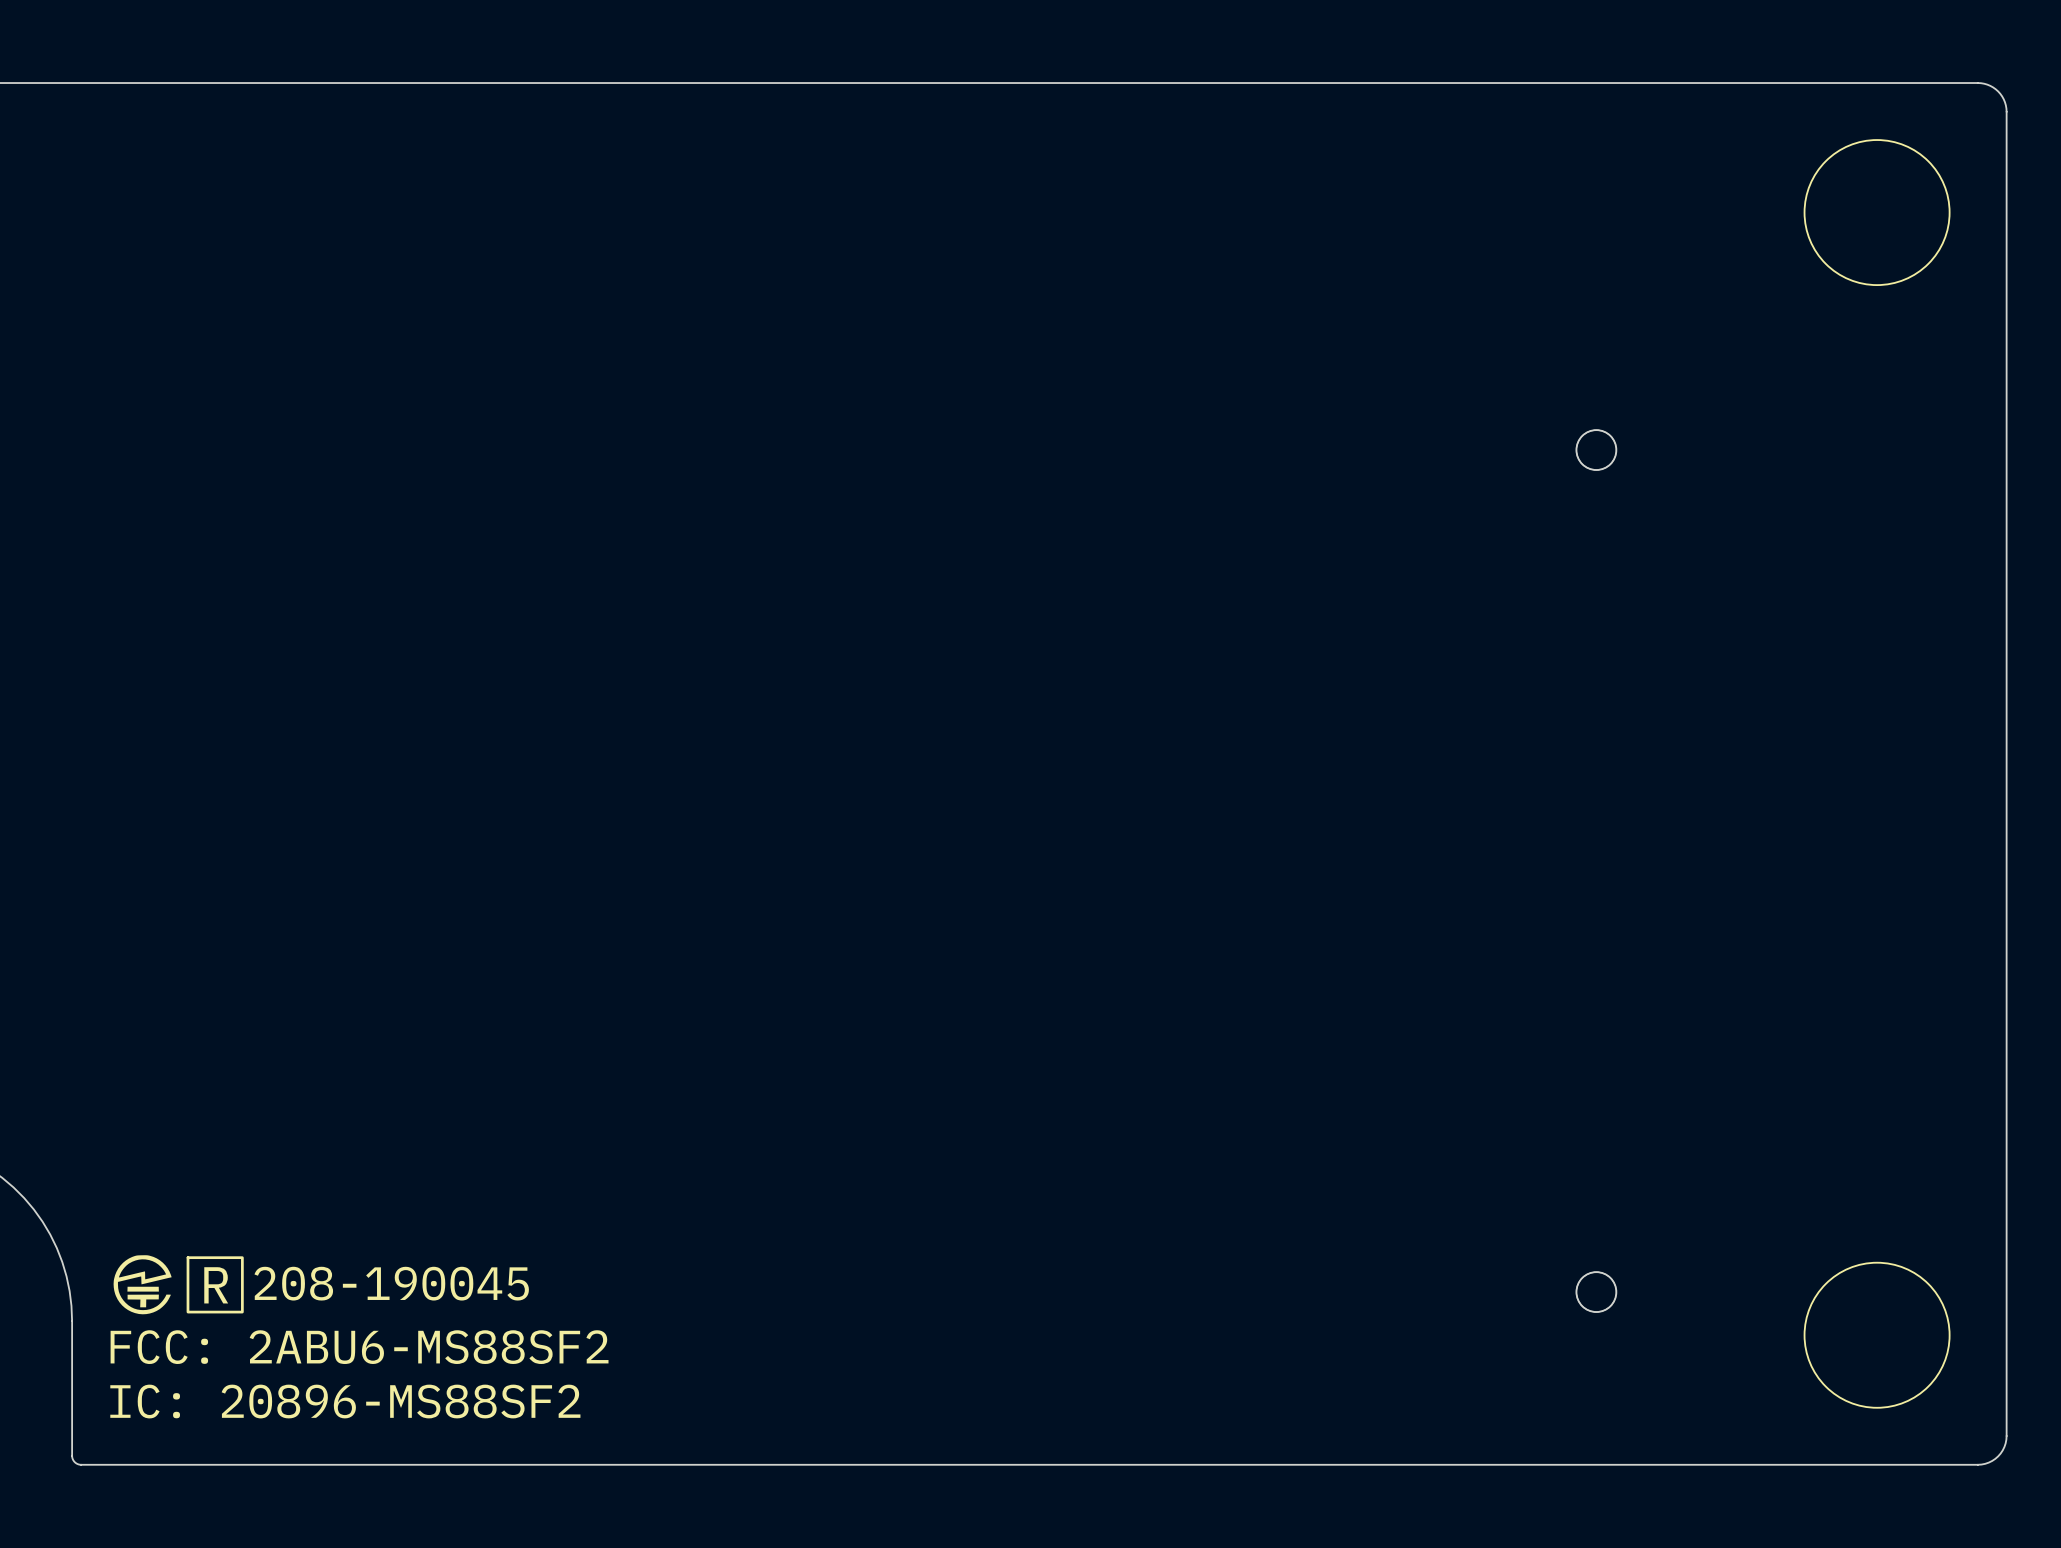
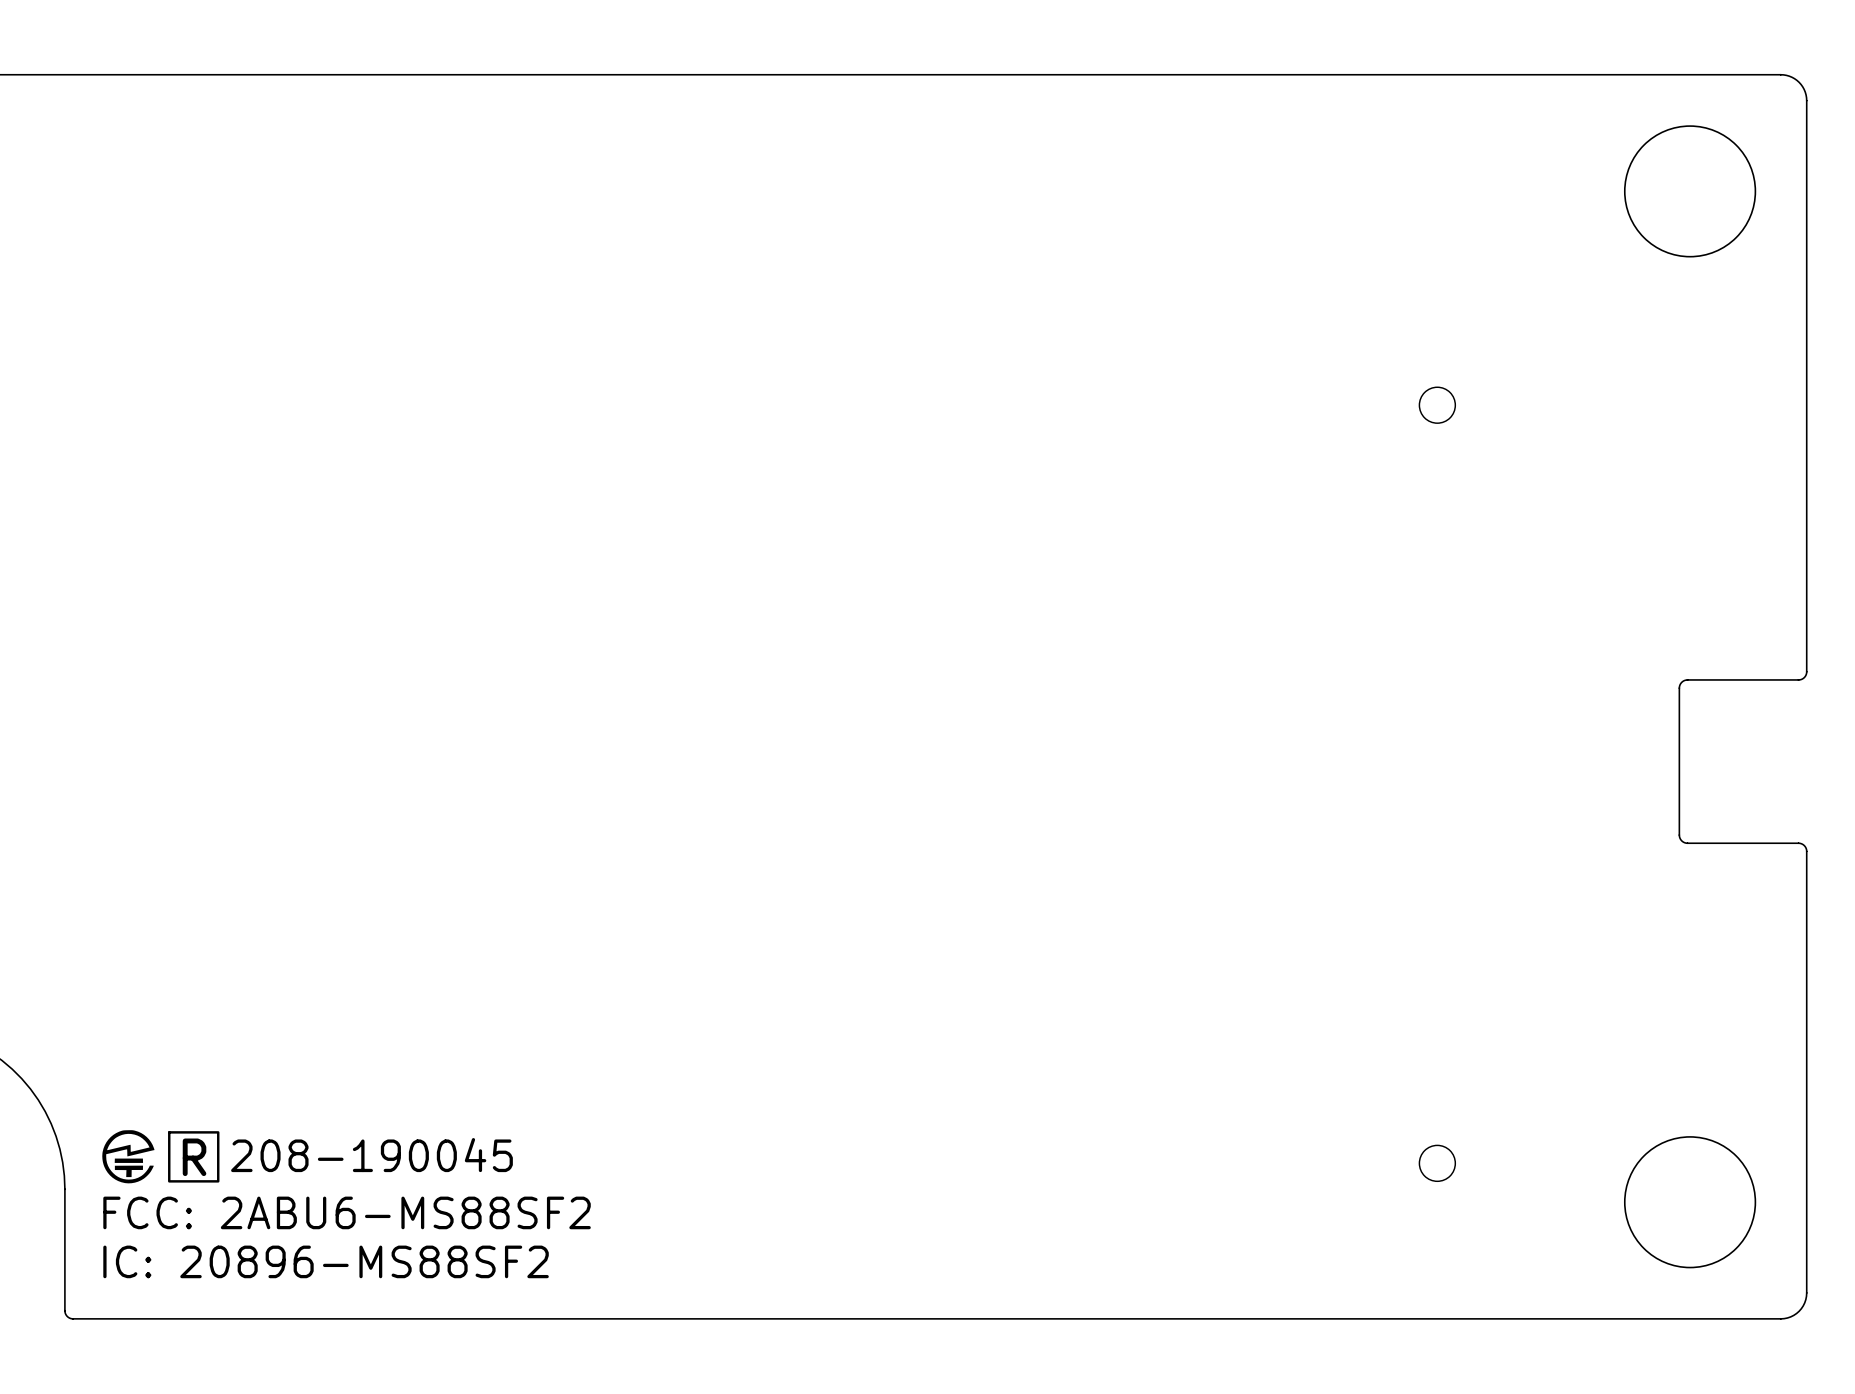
round board edge: [1575, 429, 1618, 471] -> none
board edge: (2006, 746) (2006, 945) -> (1806, 671) (1805, 676) (1799, 679) (1686, 680) (1681, 683) (1679, 688) (1679, 835) (1681, 840) (1687, 843) (1799, 843) (1804, 845) (1806, 851)
round board edge: [1575, 1271, 1618, 1313] -> none

